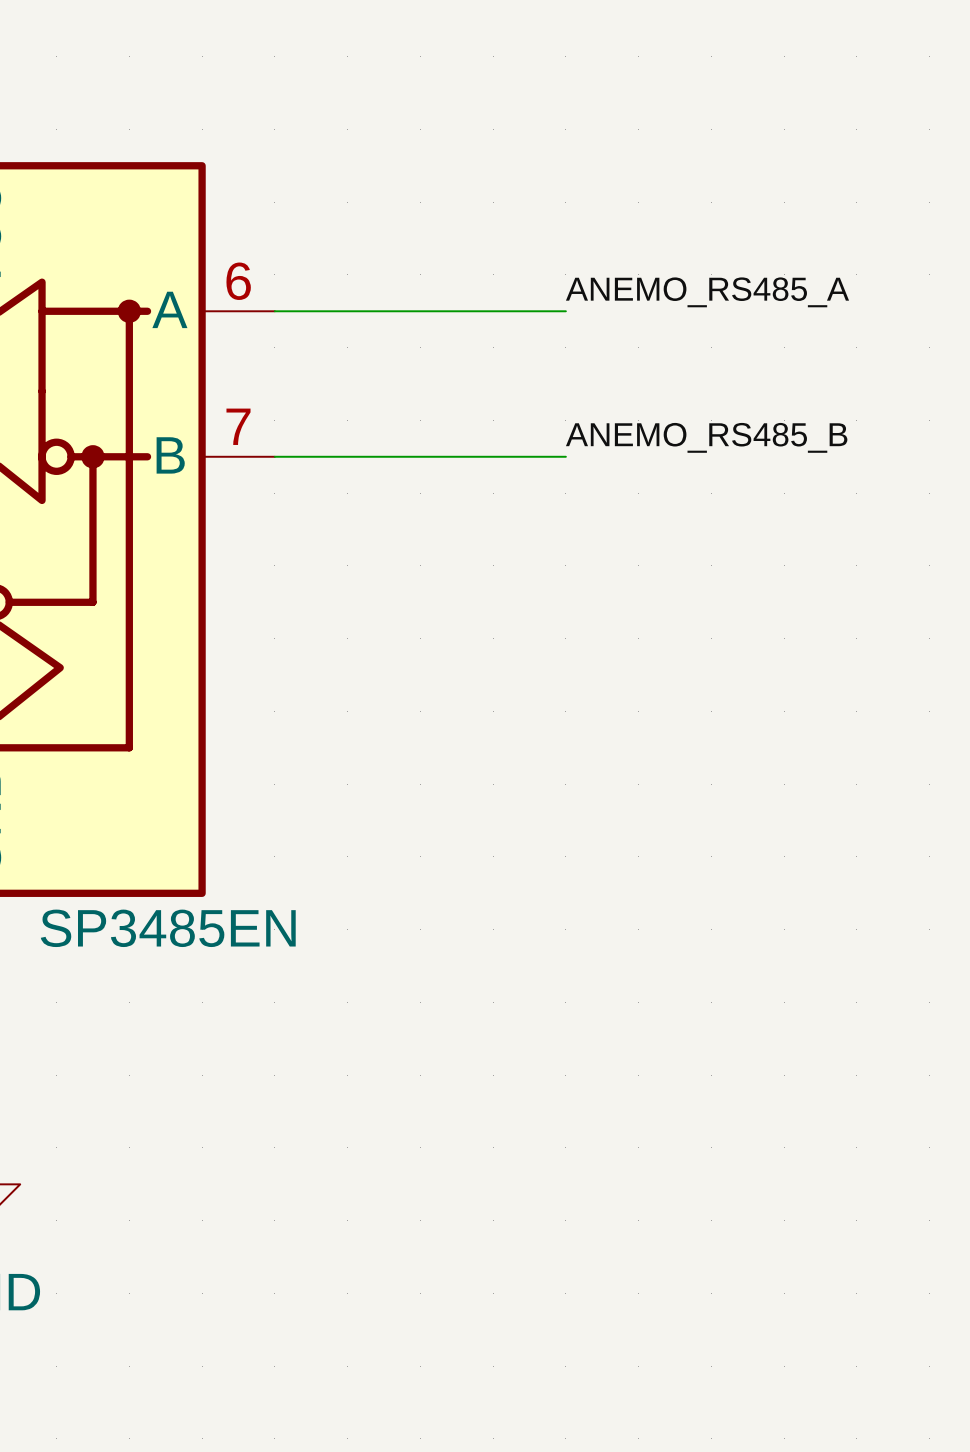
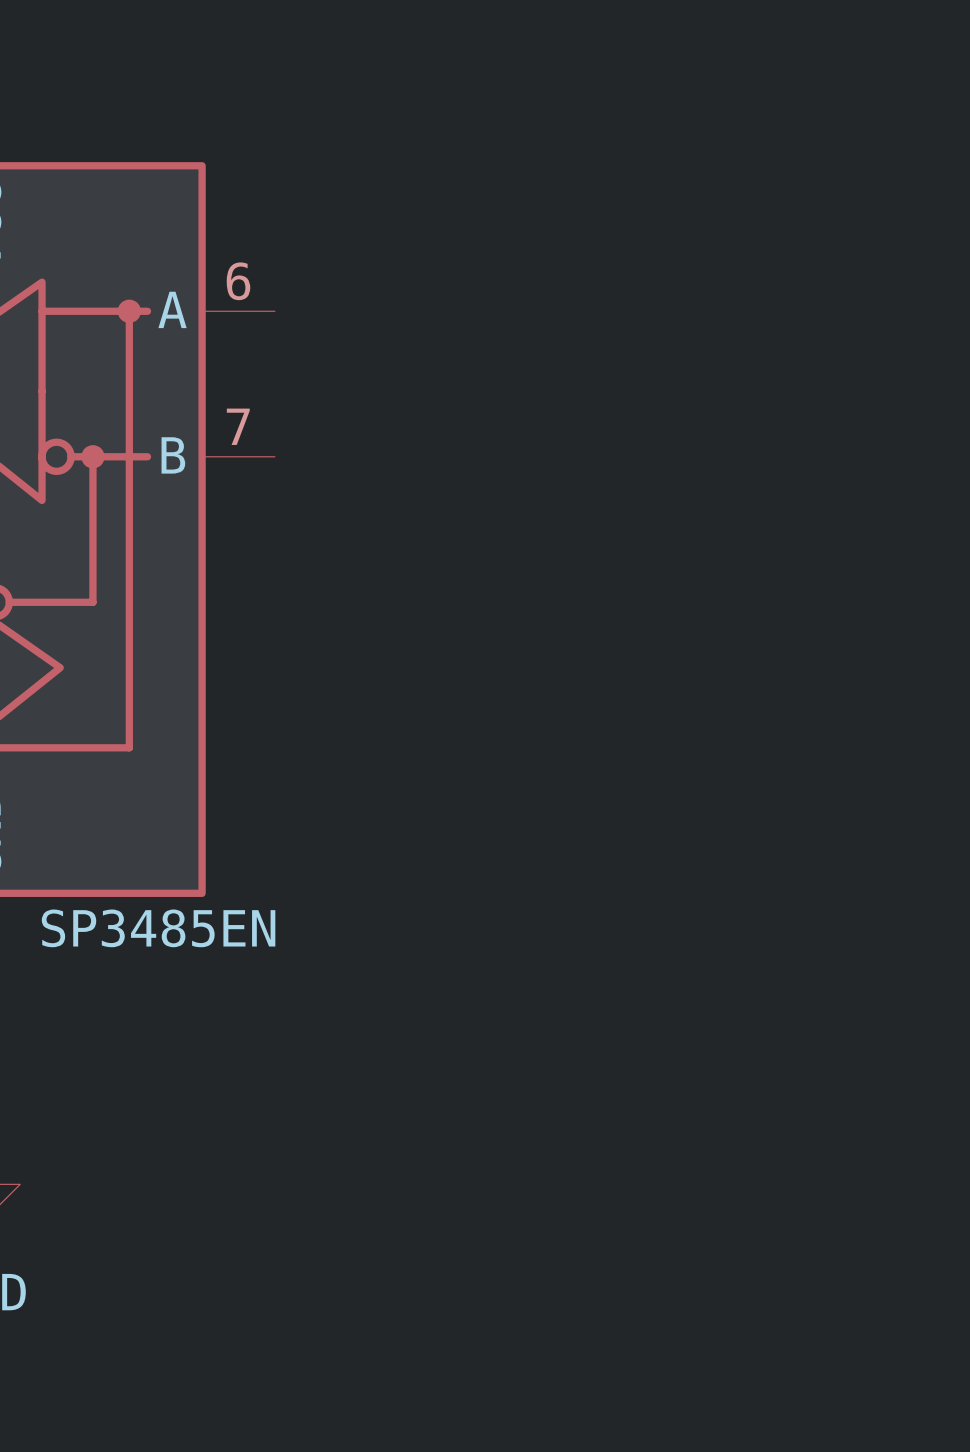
label: ANEMO_RS485_A (707, 292) -> none
wire: (274, 311) (565, 311) -> none
label: ANEMO_RS485_B (706, 437) -> none
wire: (274, 456) (565, 456) -> none

